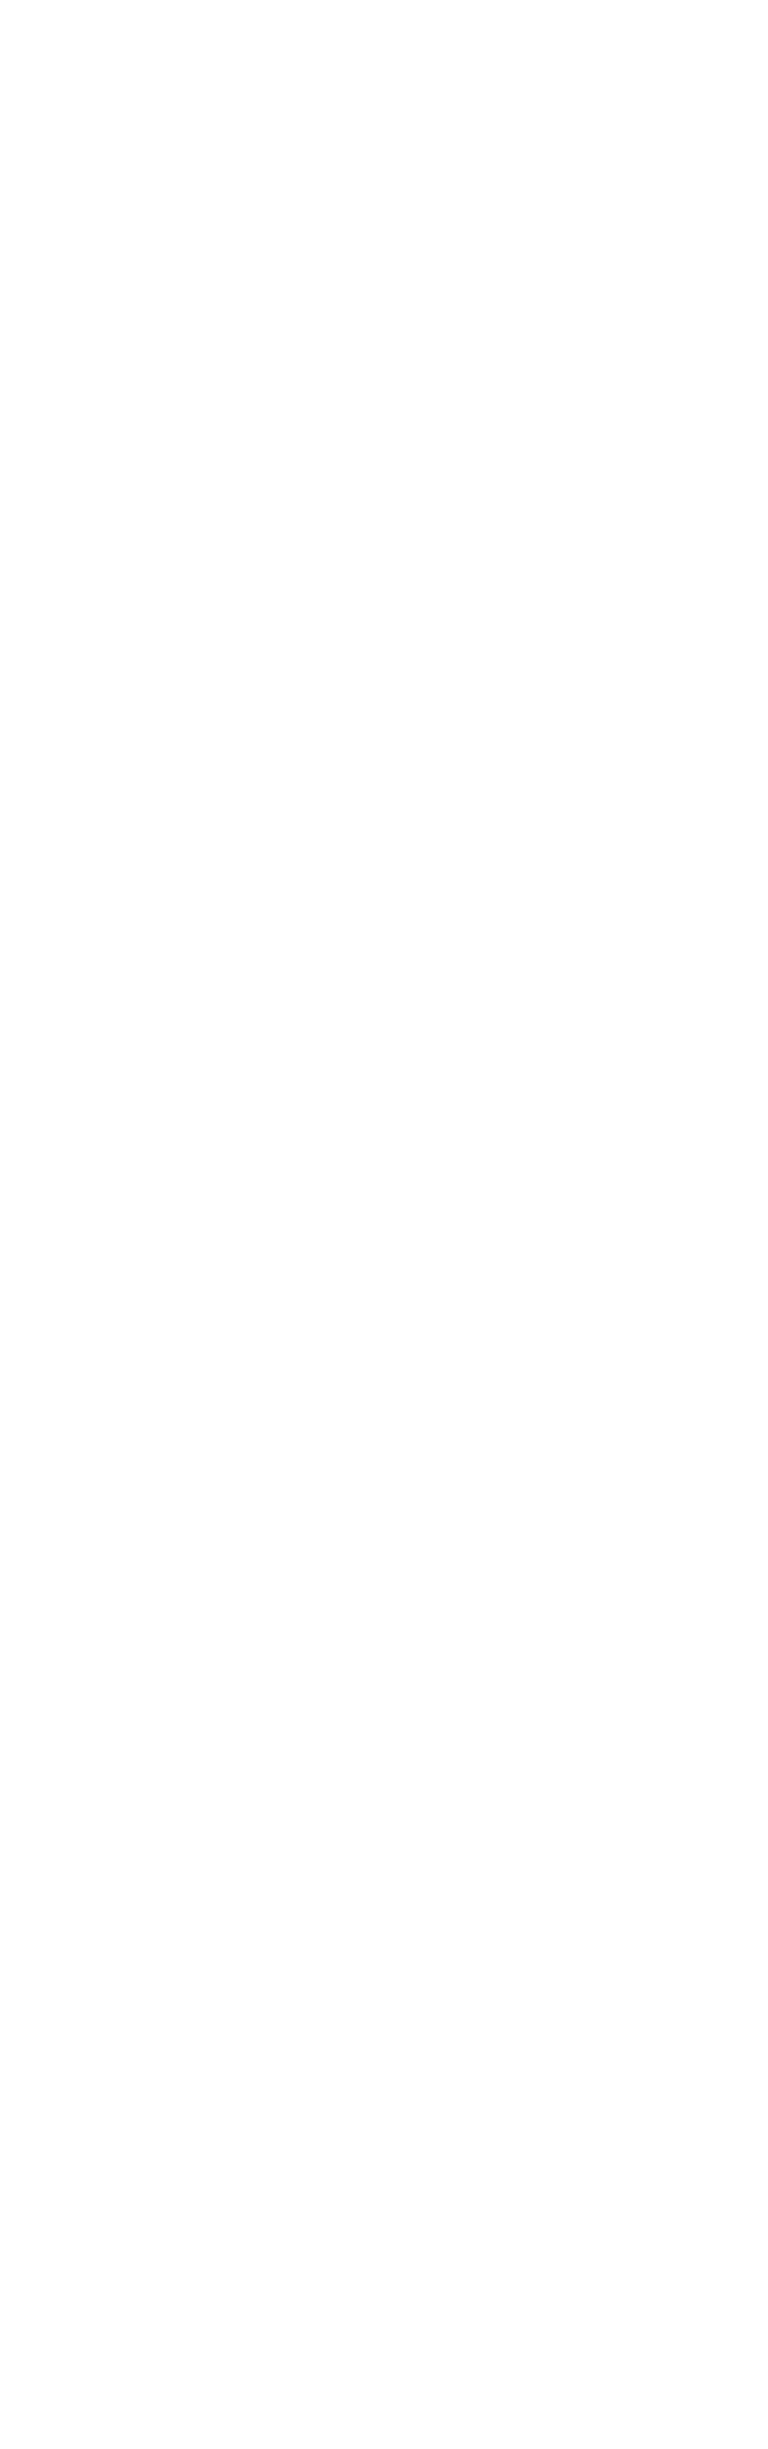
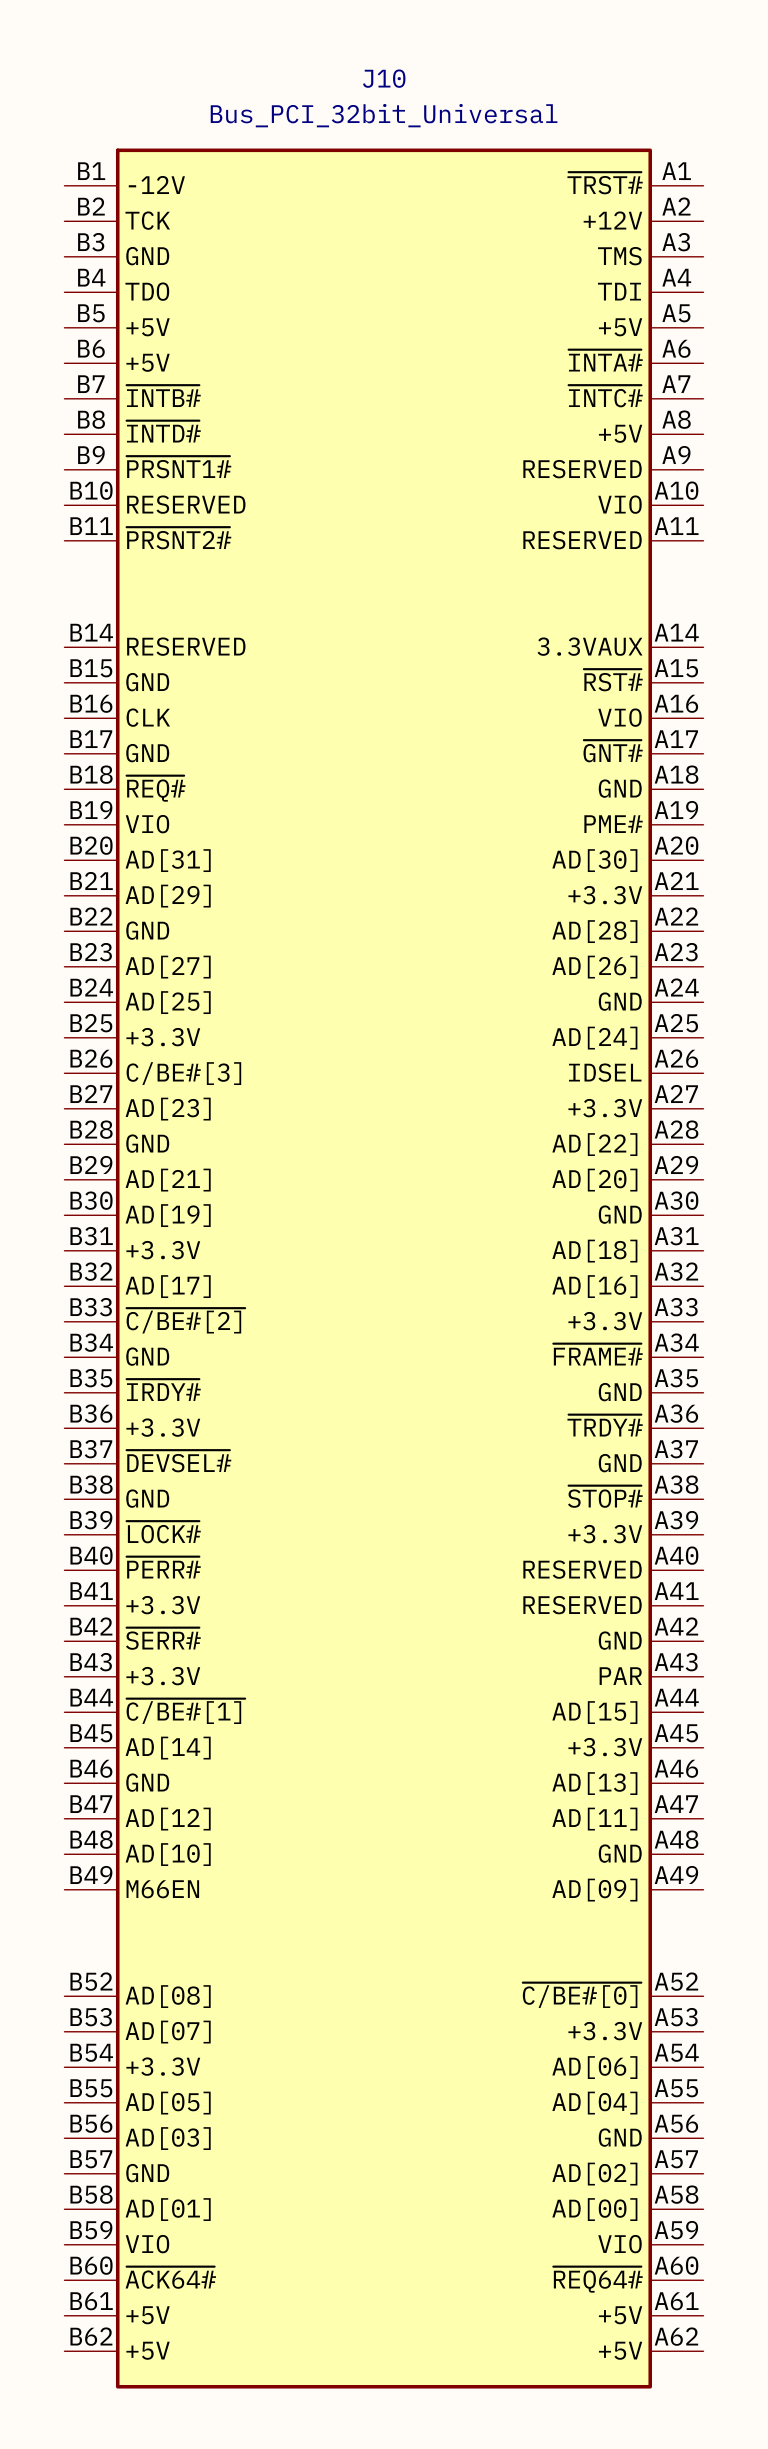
J10: none -> Bus_PCI_32bit_Universal (383, 1268)

